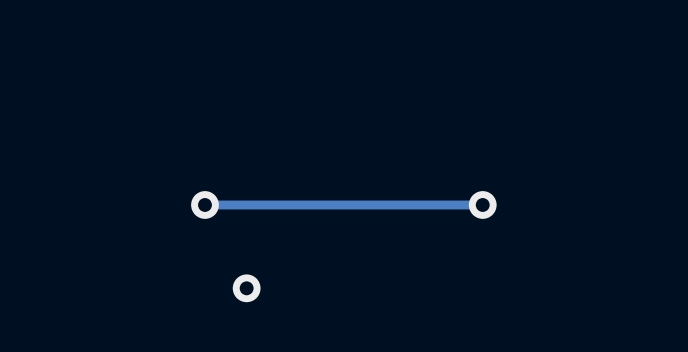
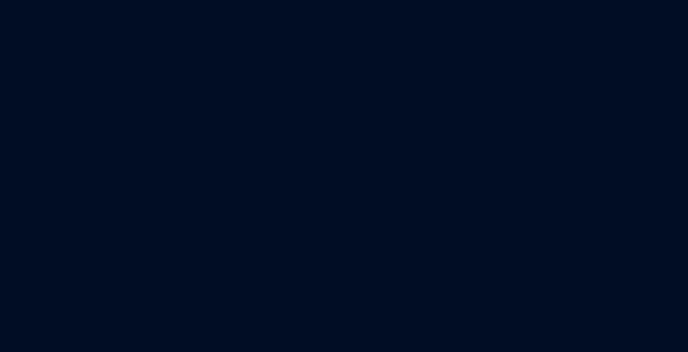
via: (204, 204) -> none
track: (482, 204) (204, 204) -> none
via: (482, 204) -> none
via: (246, 288) -> none

